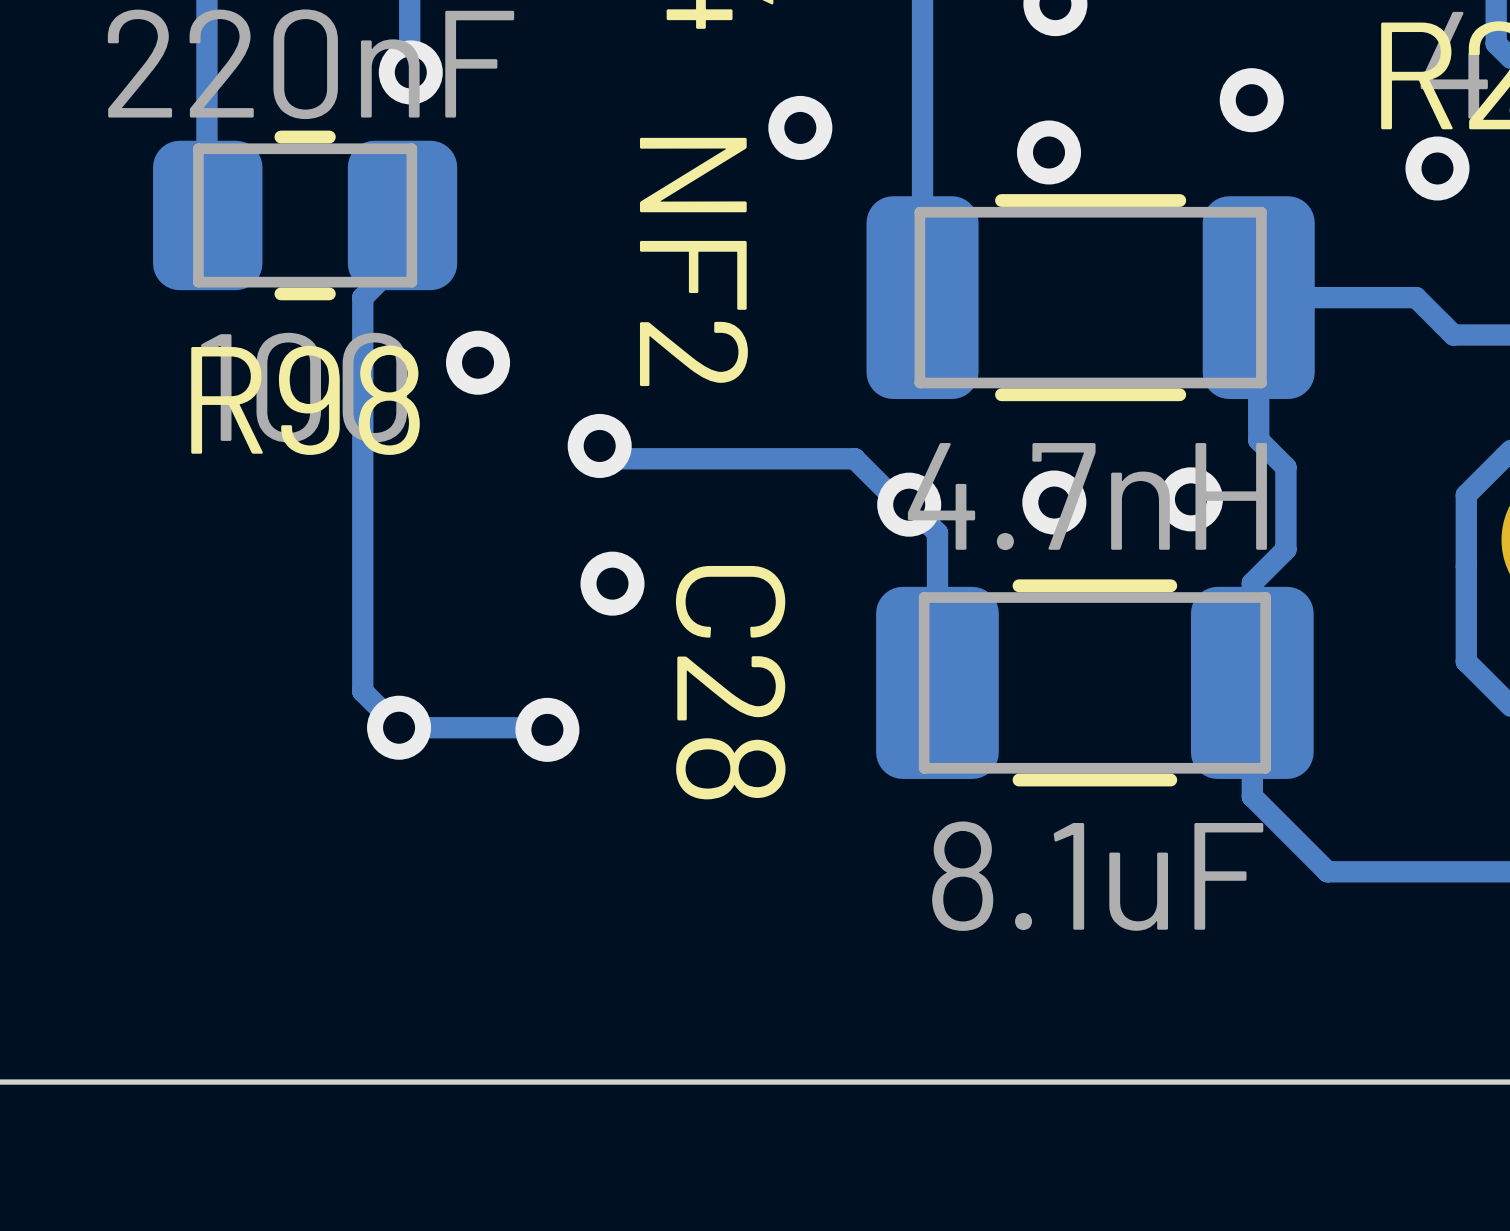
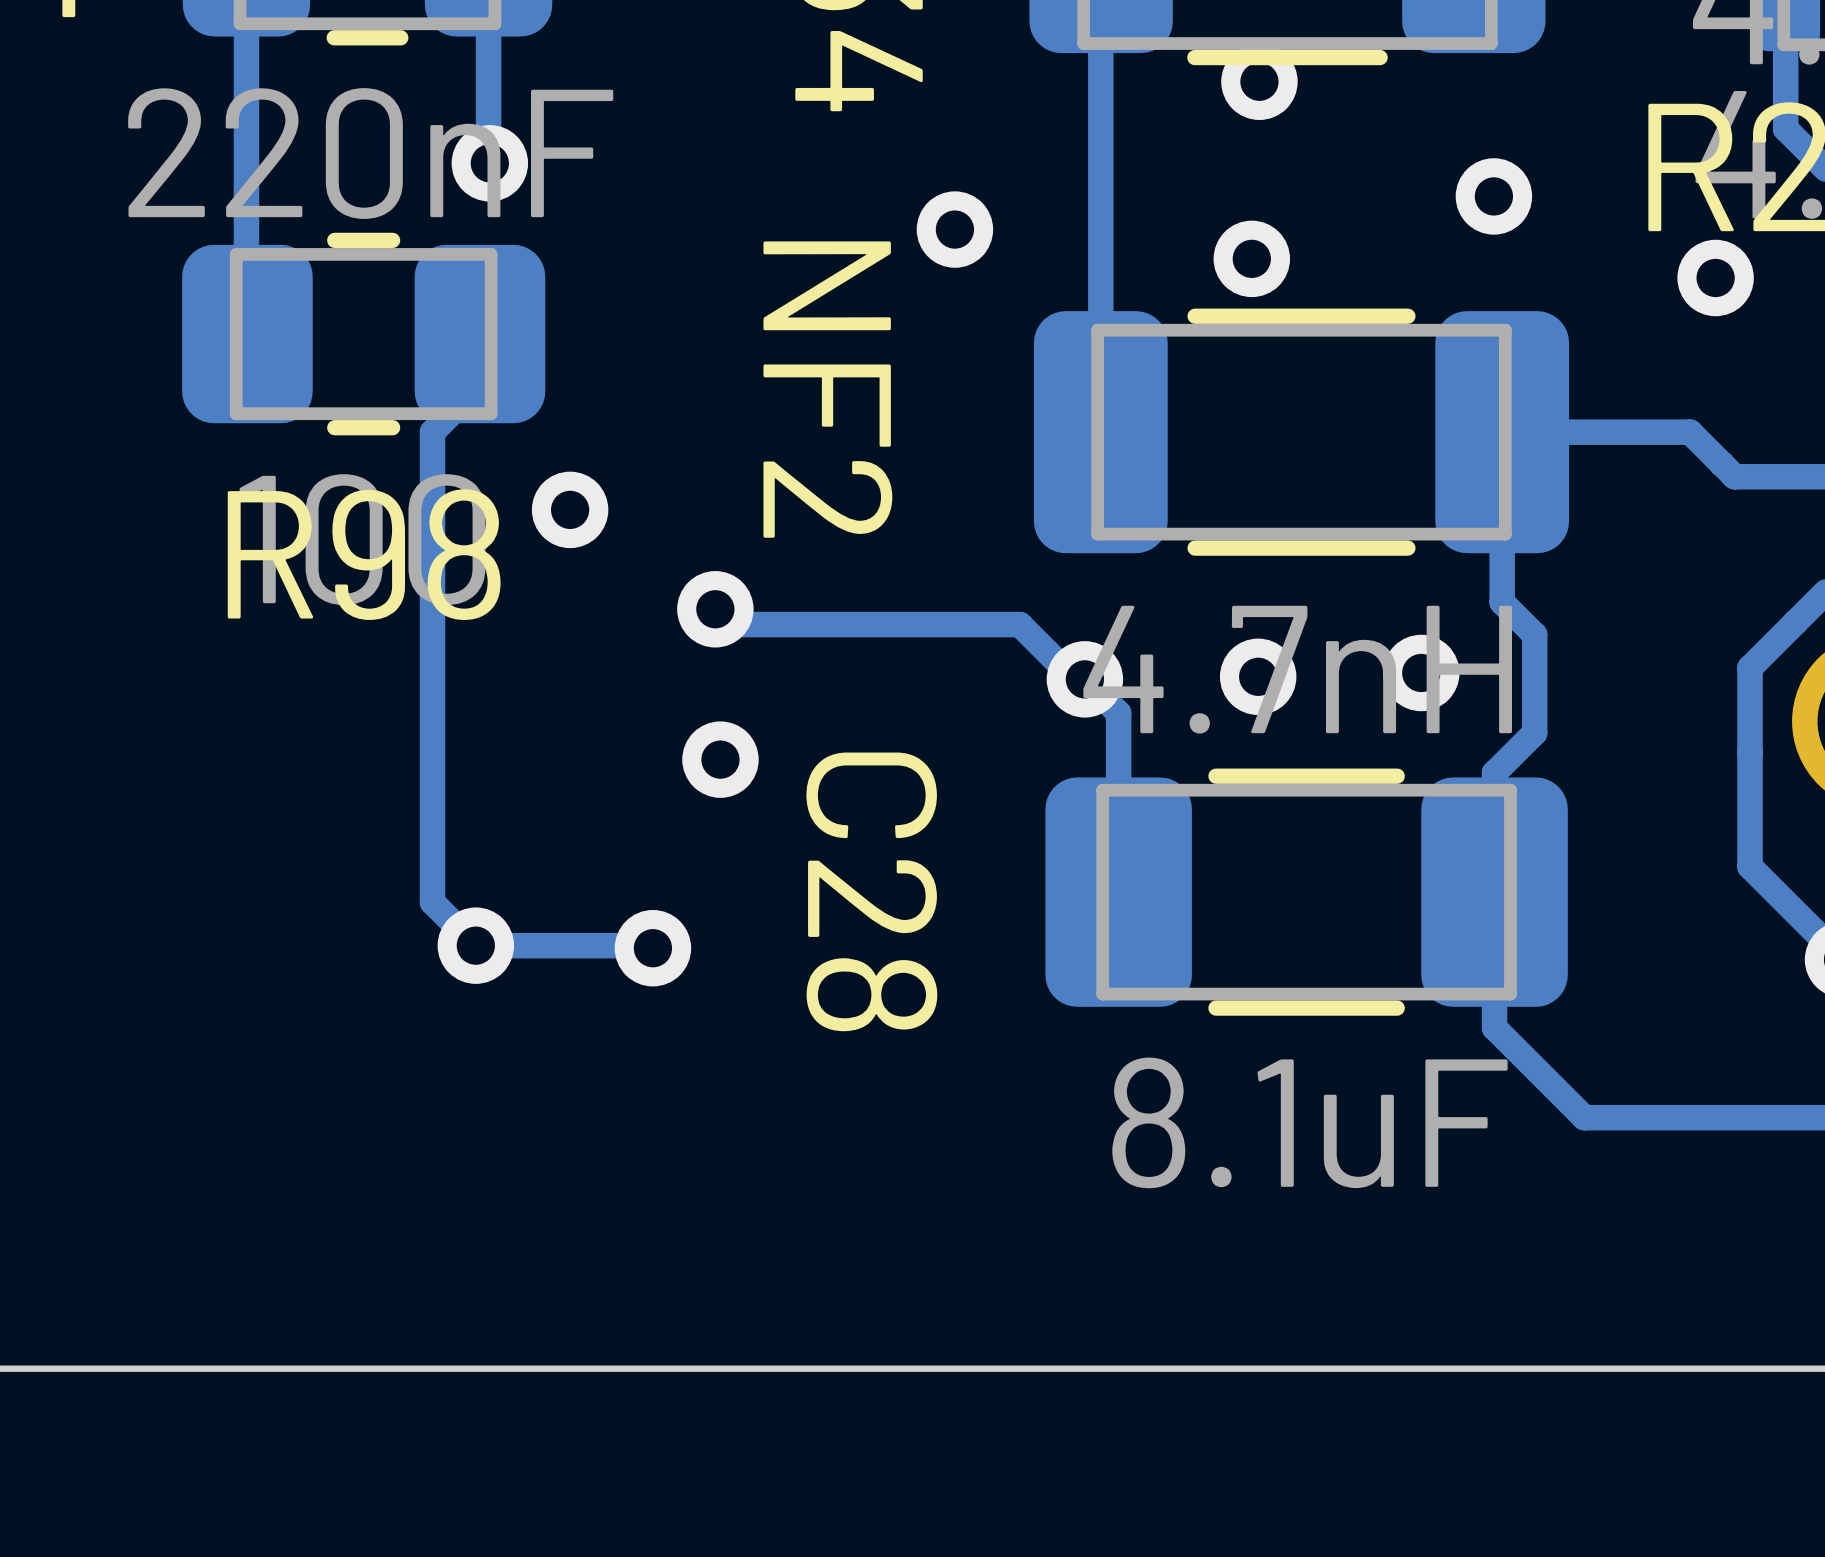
via position: (612, 583) -> (720, 759)

